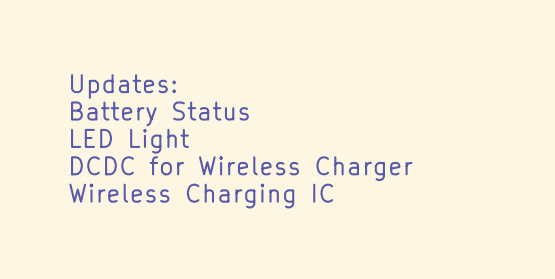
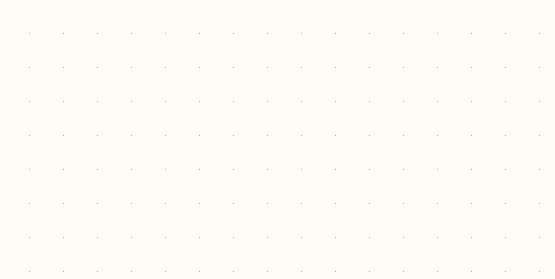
text: Updates: (123, 86) -> none
text: Battery Status (159, 113) -> none
text: LED Light (129, 141) -> none
text: DCDC for Wireless Charger (241, 168) -> none
text: Wireless Charging IC (201, 196) -> none

